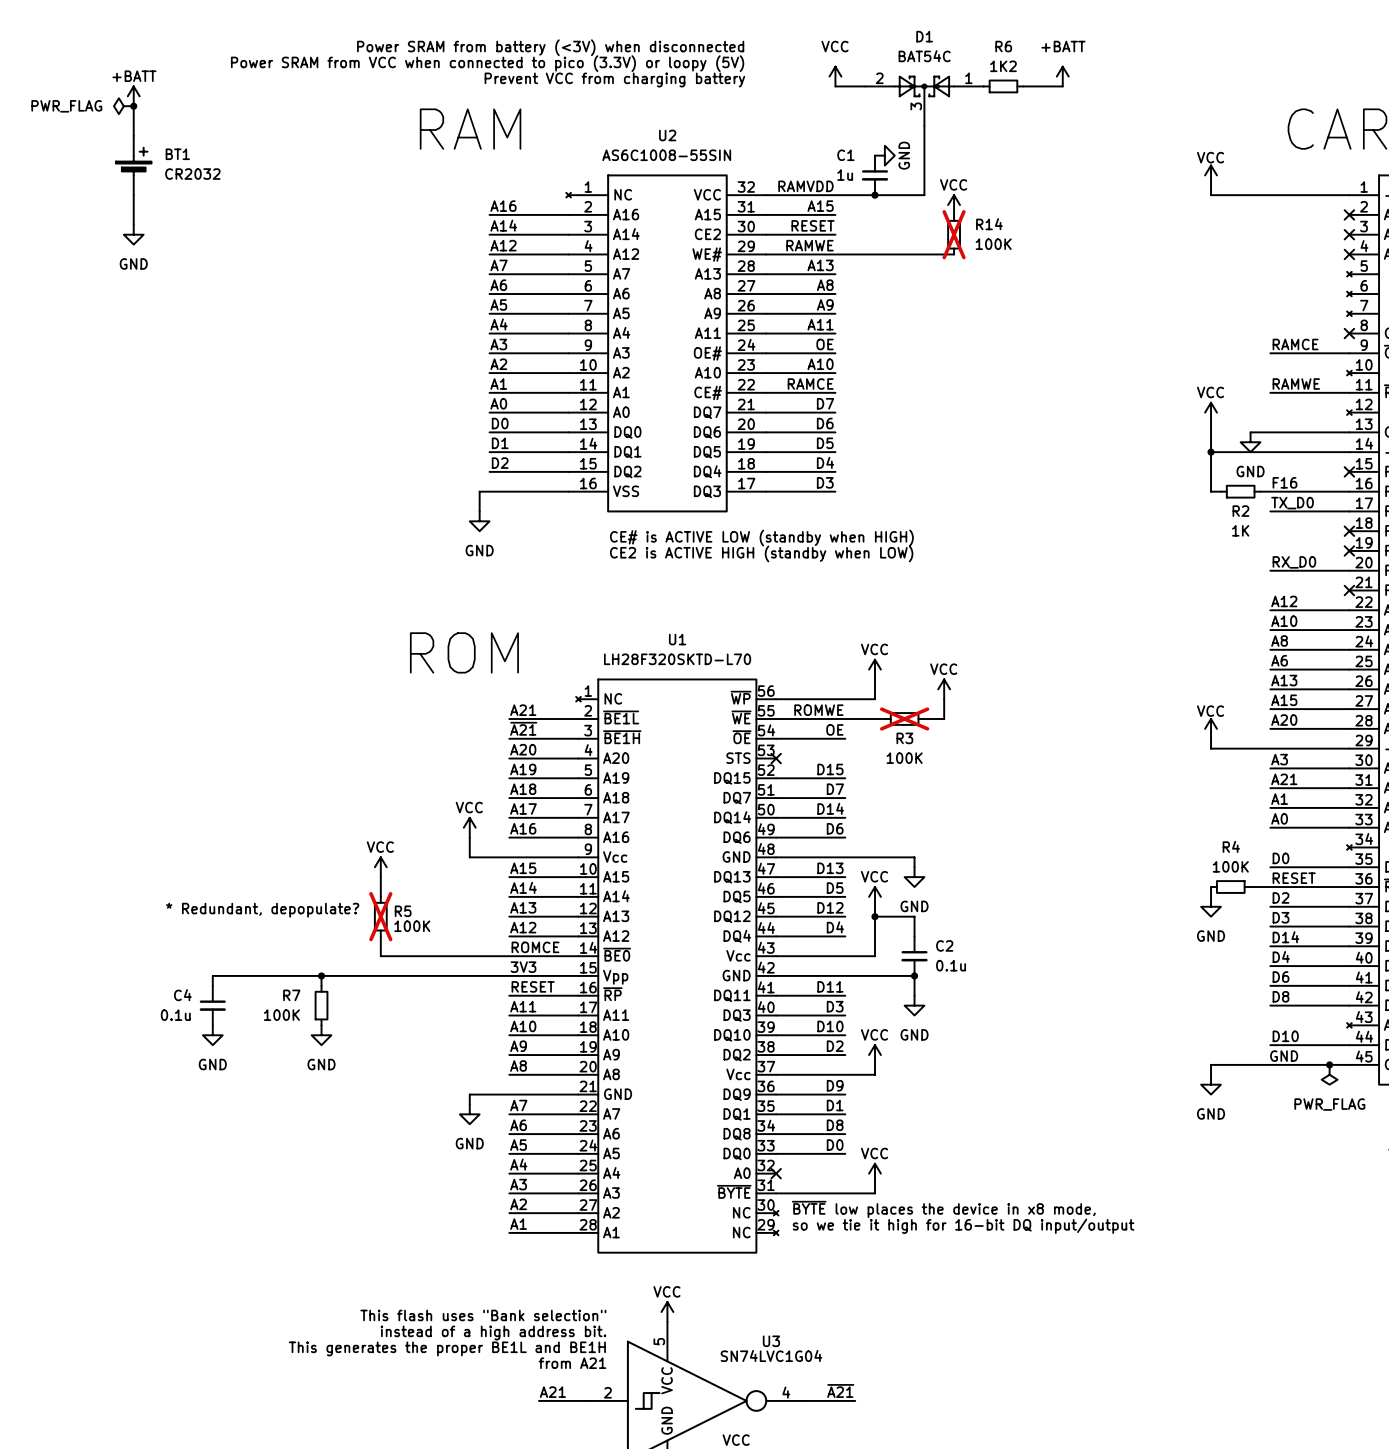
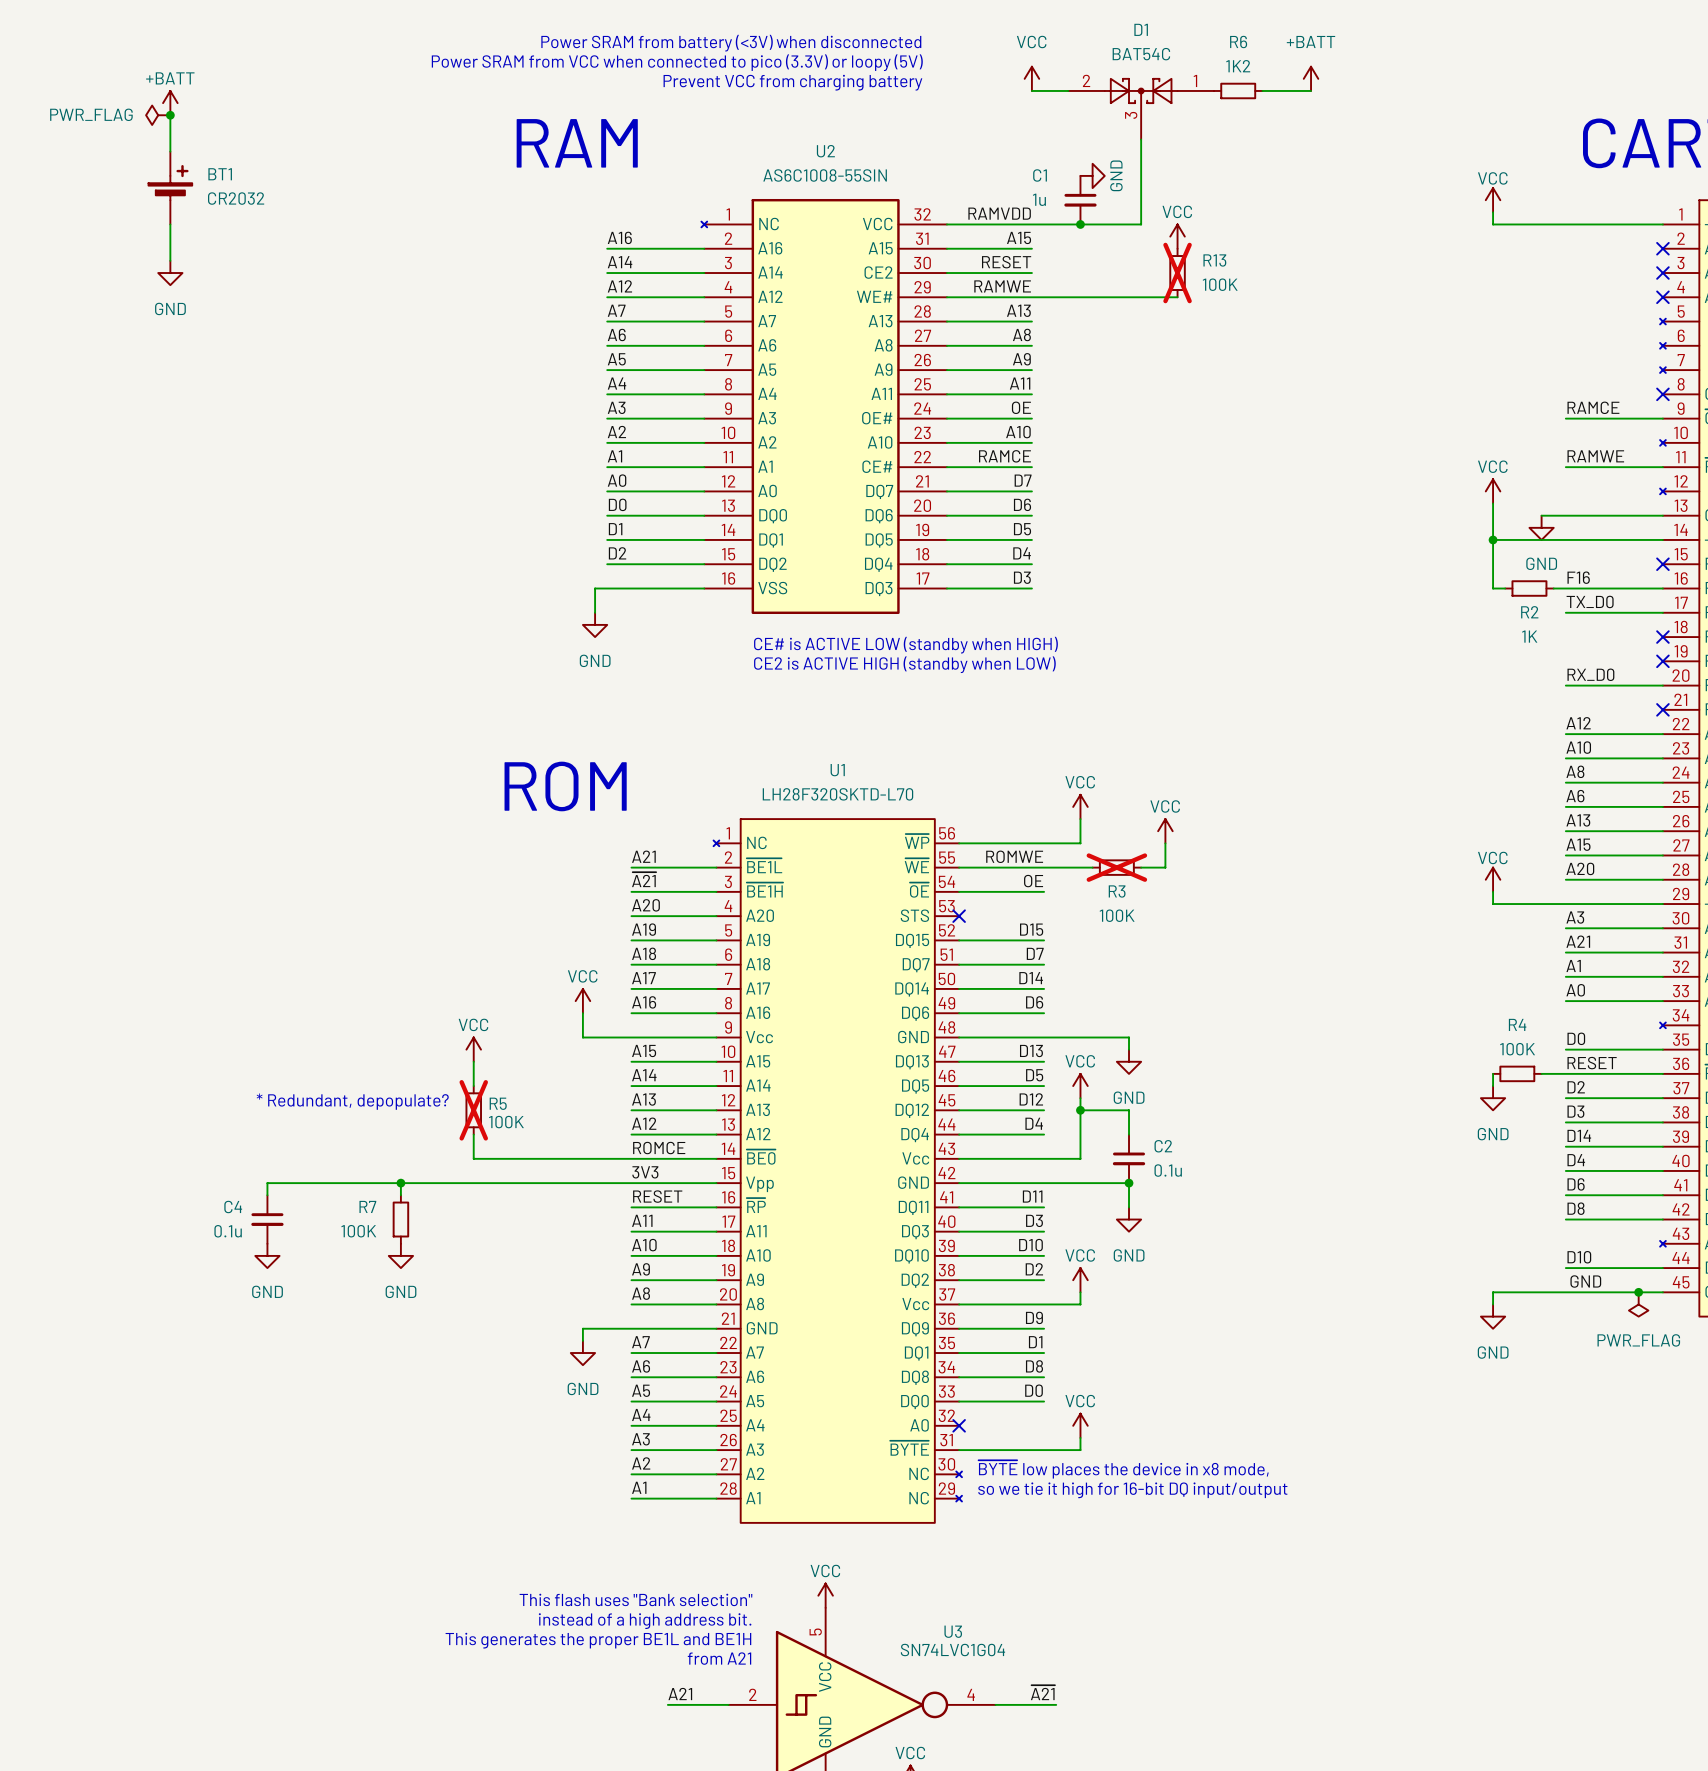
R14 name: R14 (989, 224) -> R13 (1214, 260)

